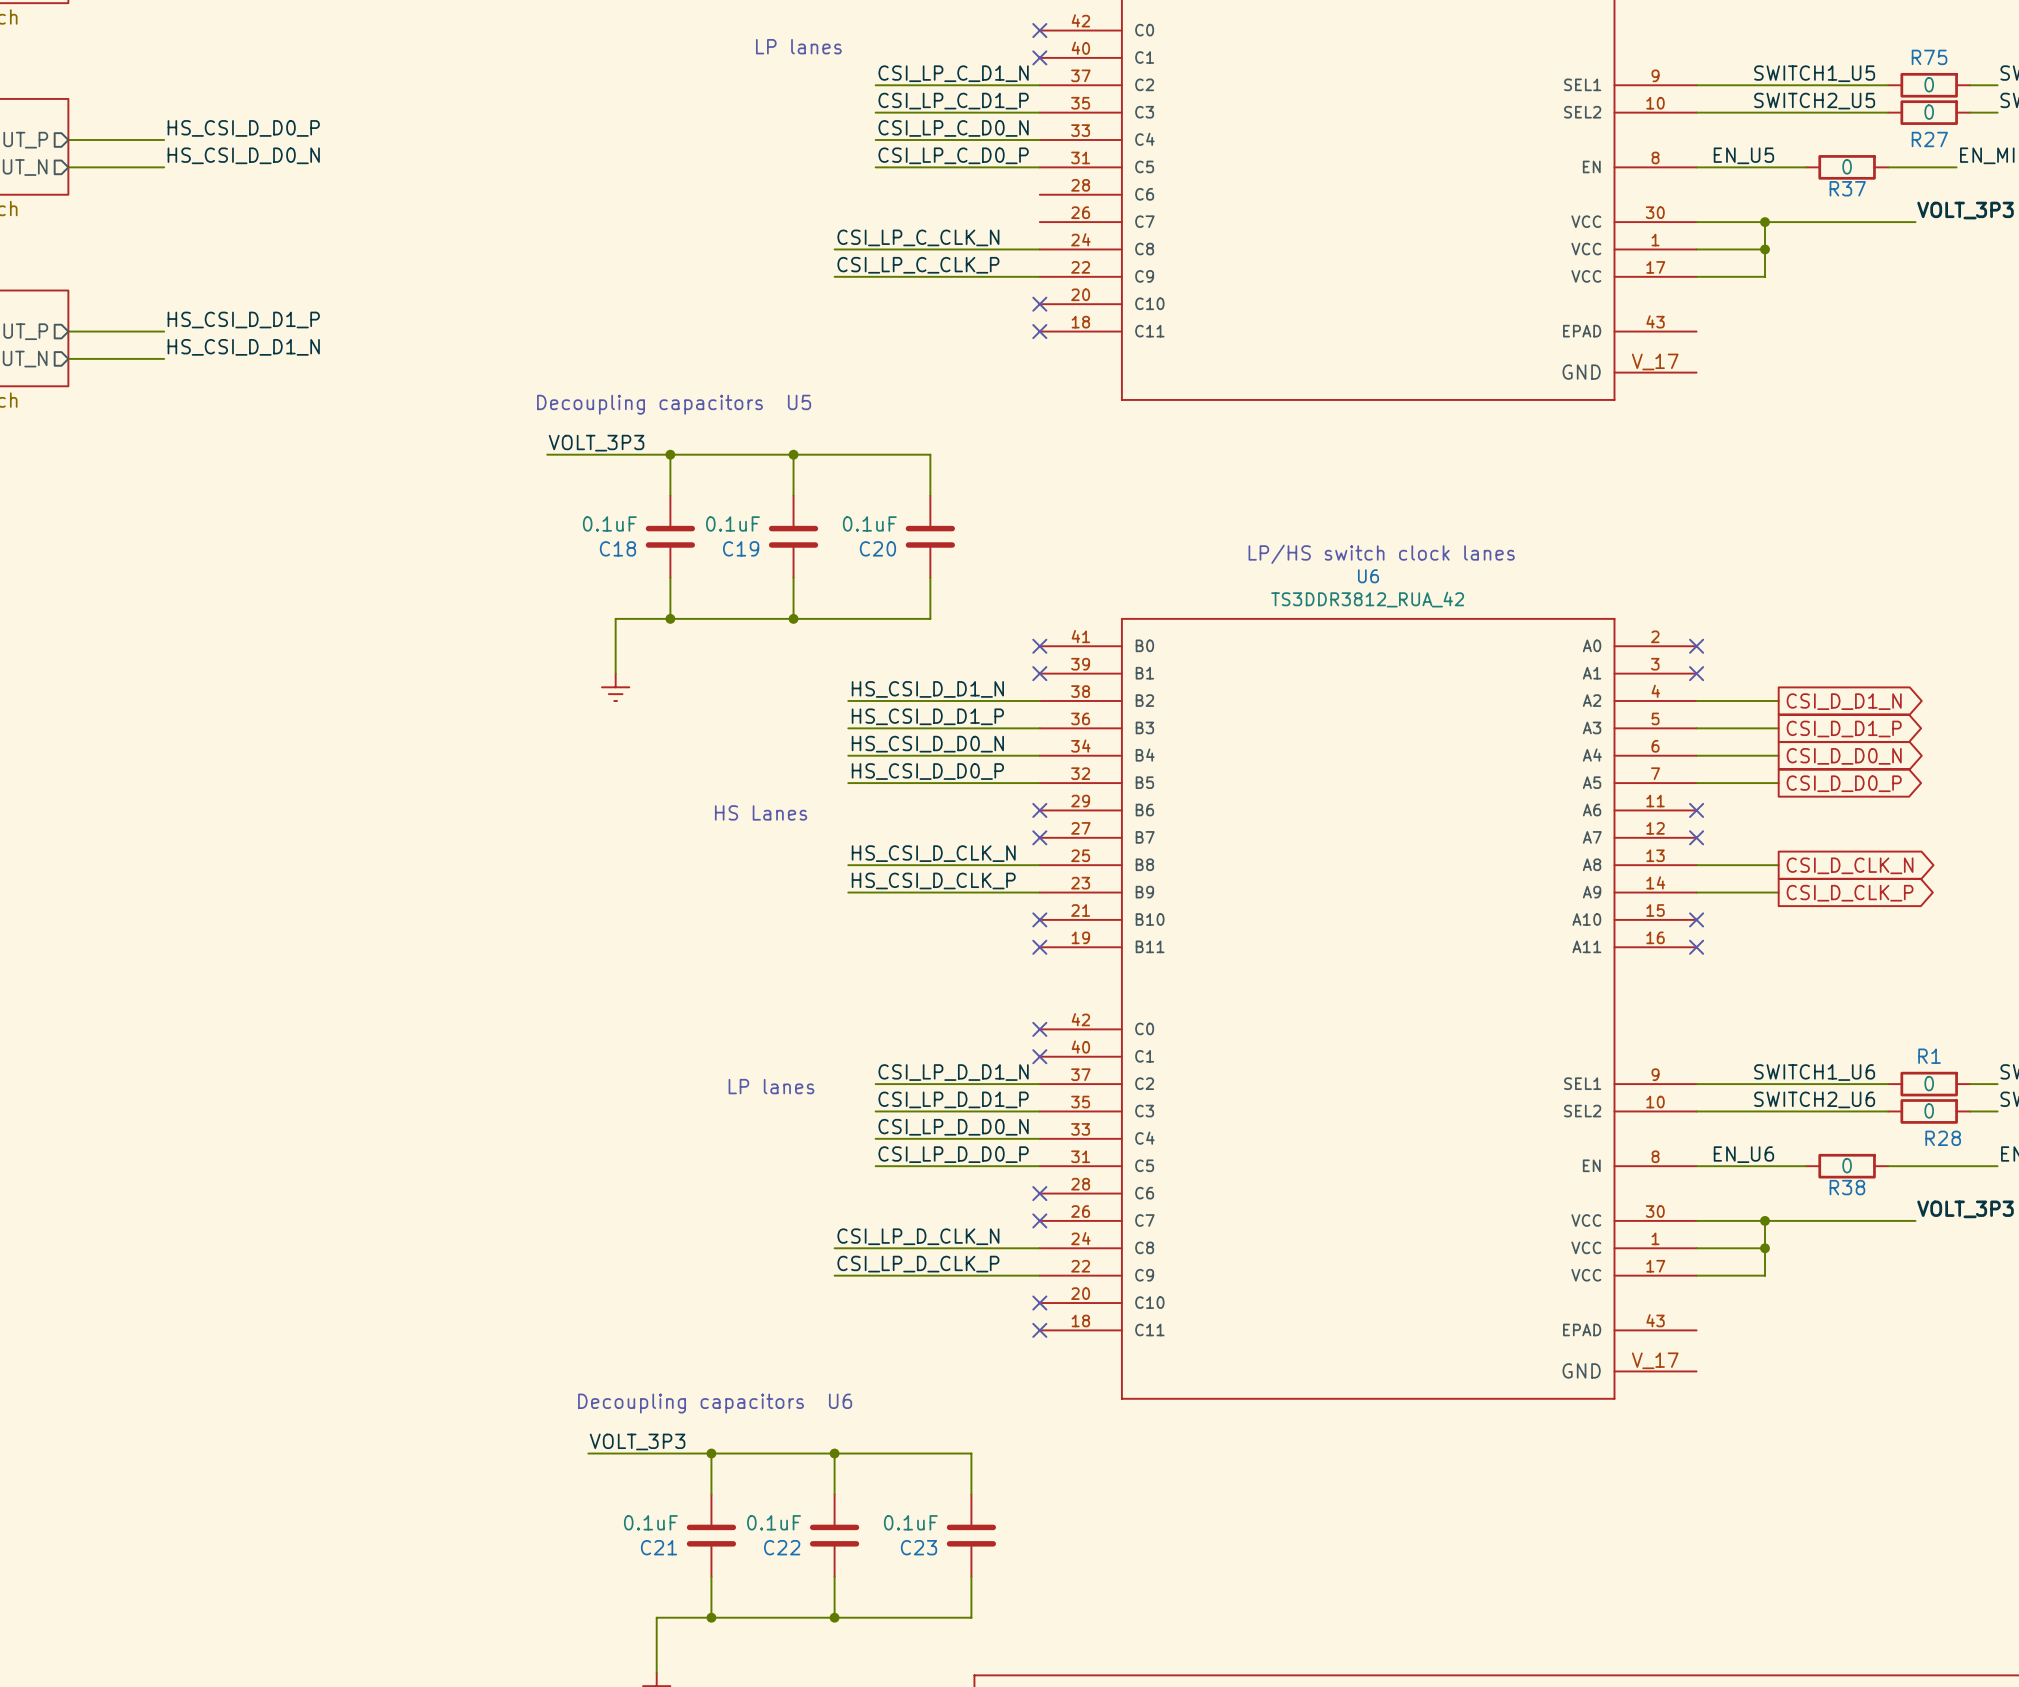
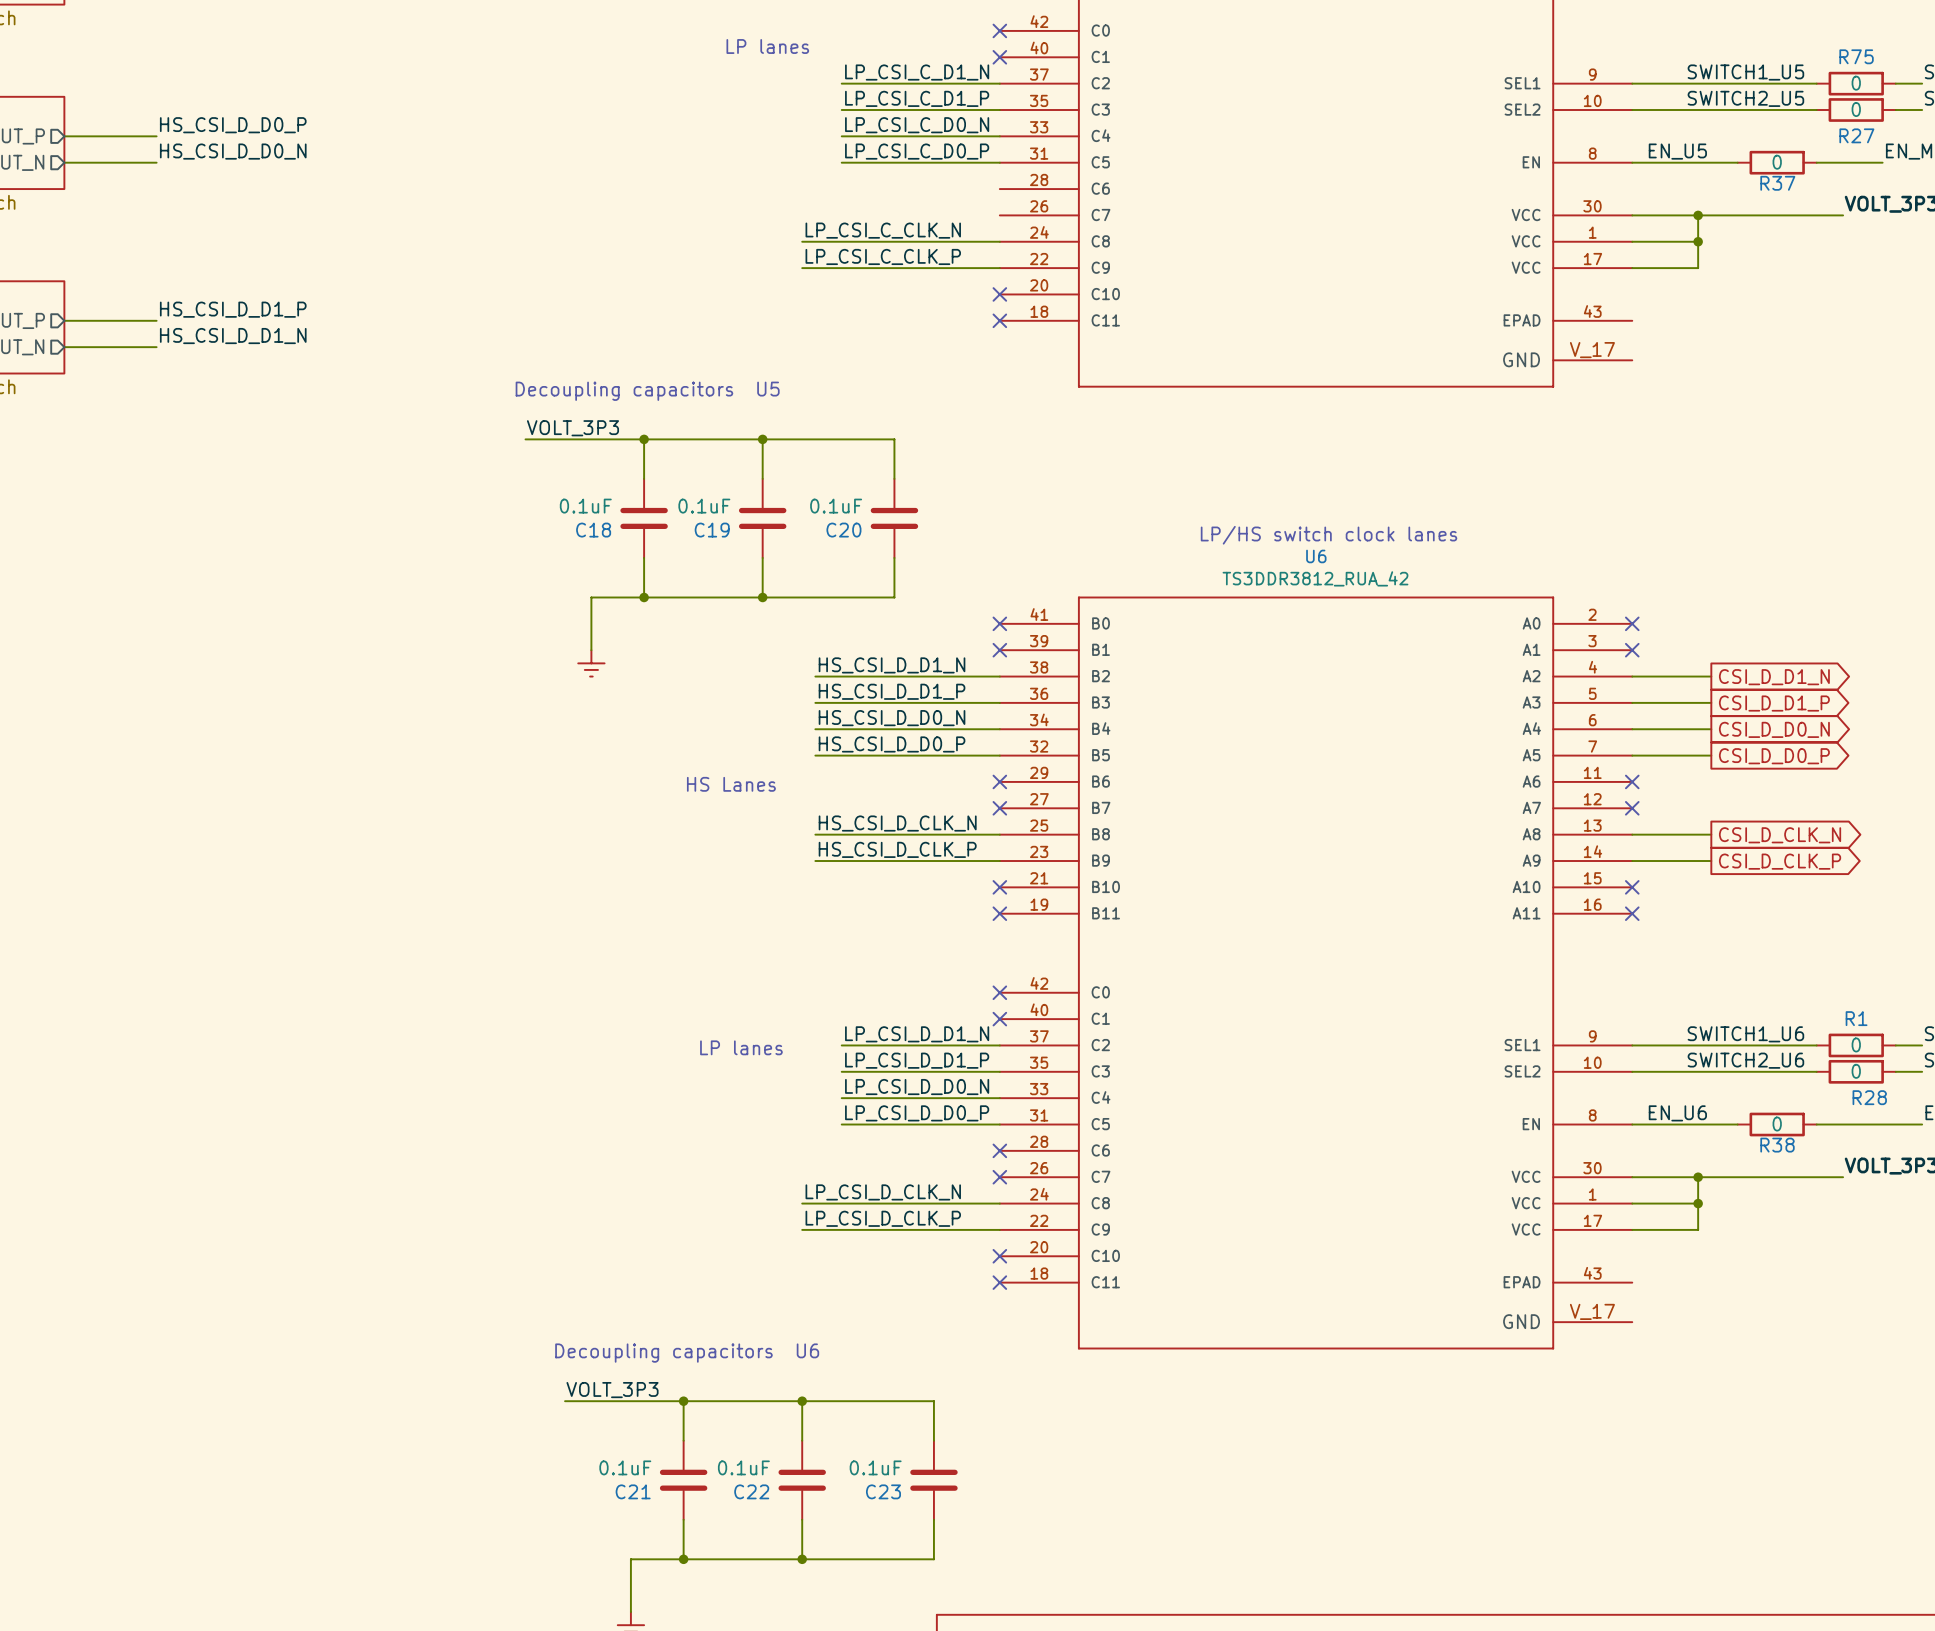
label: CSI_LP_C_D1_N (953, 73) -> LP_CSI_C_D1_N (917, 72)
label: CSI_LP_C_D1_P (953, 101) -> LP_CSI_C_D1_P (917, 98)
label: CSI_LP_C_D0_N (953, 128) -> LP_CSI_C_D0_N (917, 125)
label: CSI_LP_C_D0_P (953, 155) -> LP_CSI_C_D0_P (917, 151)
label: CSI_LP_C_CLK_N (918, 237) -> LP_CSI_C_CLK_N (883, 230)
label: CSI_LP_C_CLK_P (918, 265) -> LP_CSI_C_CLK_P (883, 256)
label: CSI_LP_D_D1_N (953, 1072) -> LP_CSI_D_D1_N (917, 1034)
label: CSI_LP_D_D1_P (953, 1099) -> LP_CSI_D_D1_P (917, 1060)
label: CSI_LP_D_D0_N (953, 1127) -> LP_CSI_D_D0_N (917, 1087)
label: CSI_LP_D_D0_P (953, 1154) -> LP_CSI_D_D0_P (917, 1113)
label: CSI_LP_D_CLK_N (918, 1236) -> LP_CSI_D_CLK_N (883, 1192)
label: CSI_LP_D_CLK_P (918, 1264) -> LP_CSI_D_CLK_P (883, 1218)

